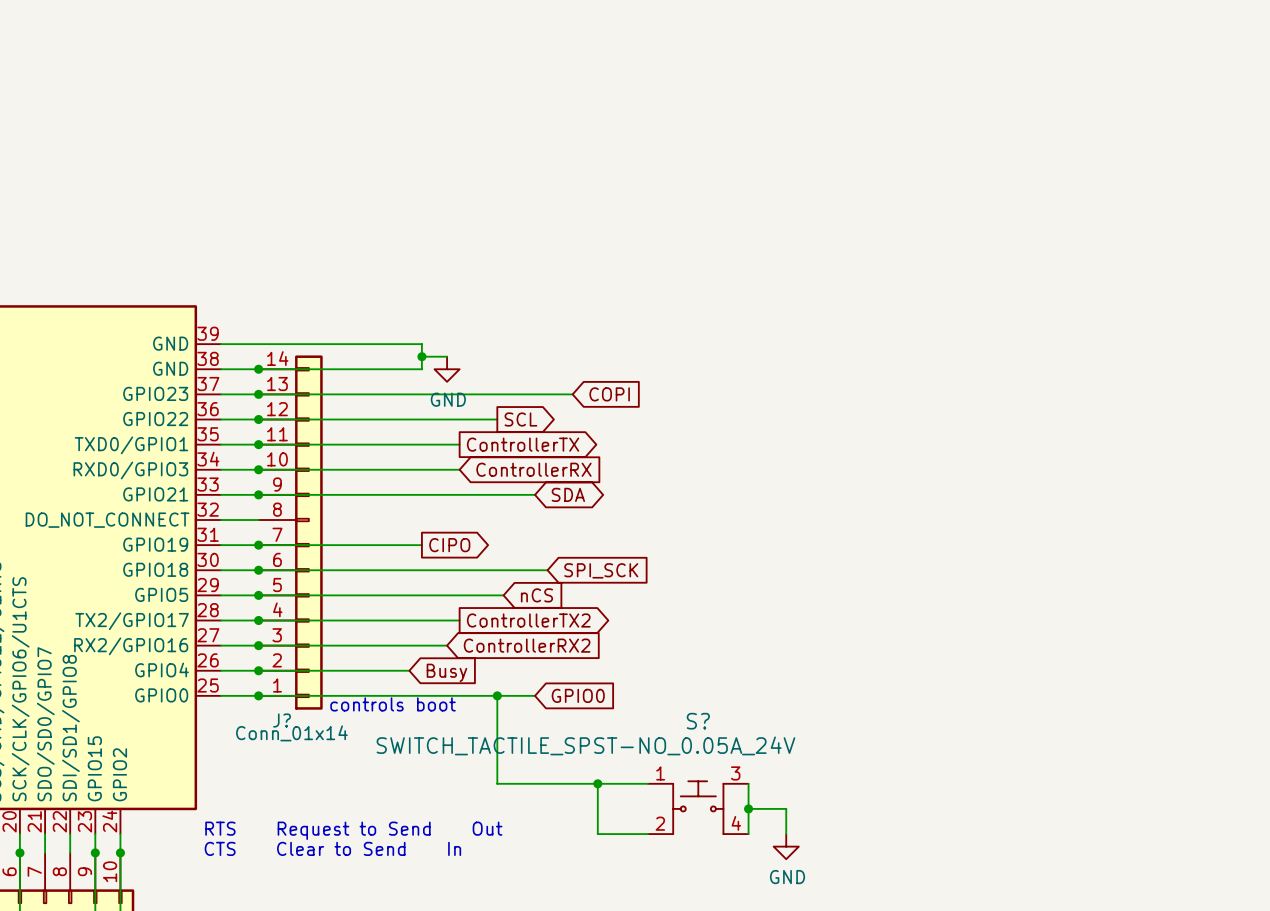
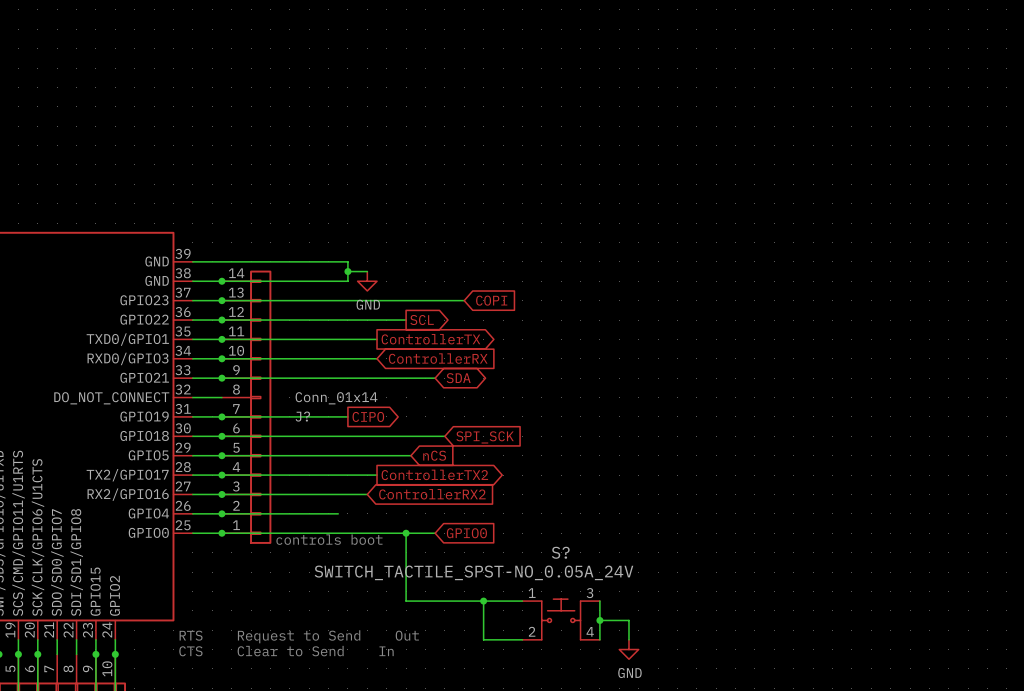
global label: Busy (446, 672) -> none
J? name position: J? (282, 720) -> J? (302, 416)
J? value position: Conn_01x14 (291, 733) -> Conn_01x14 (336, 398)

